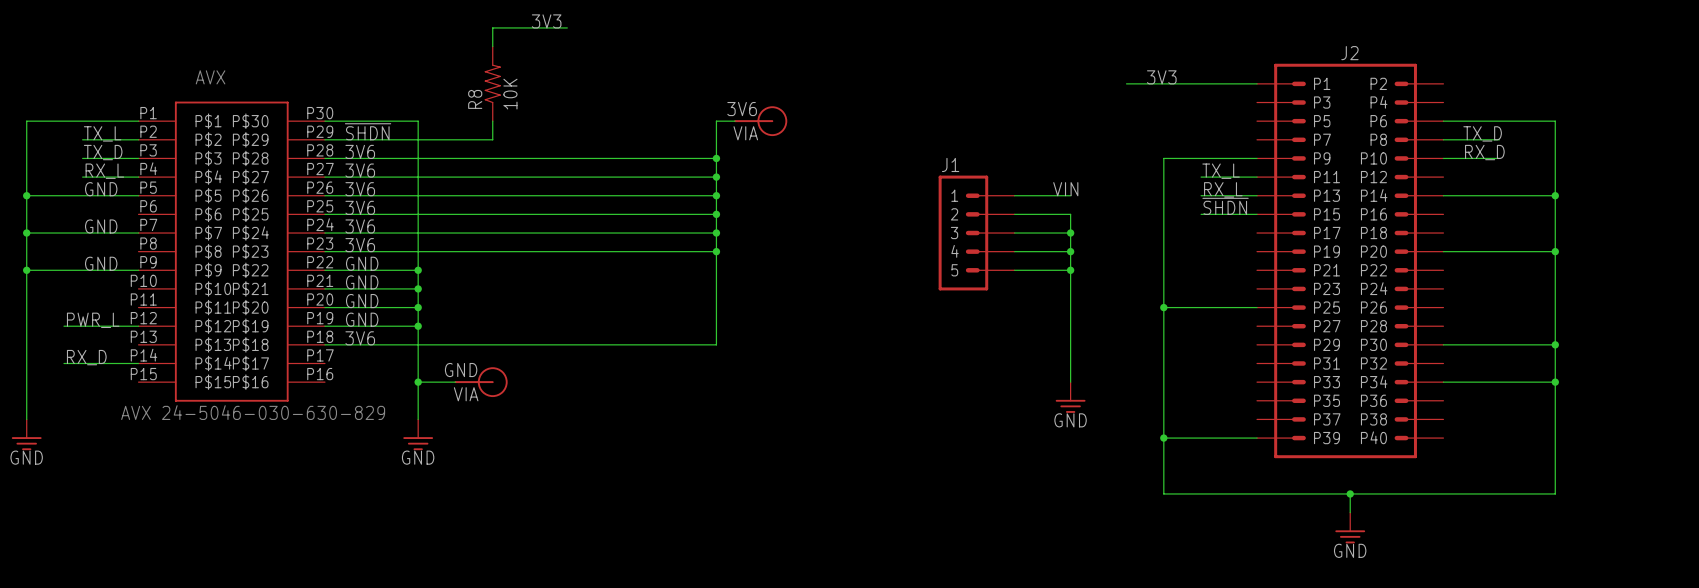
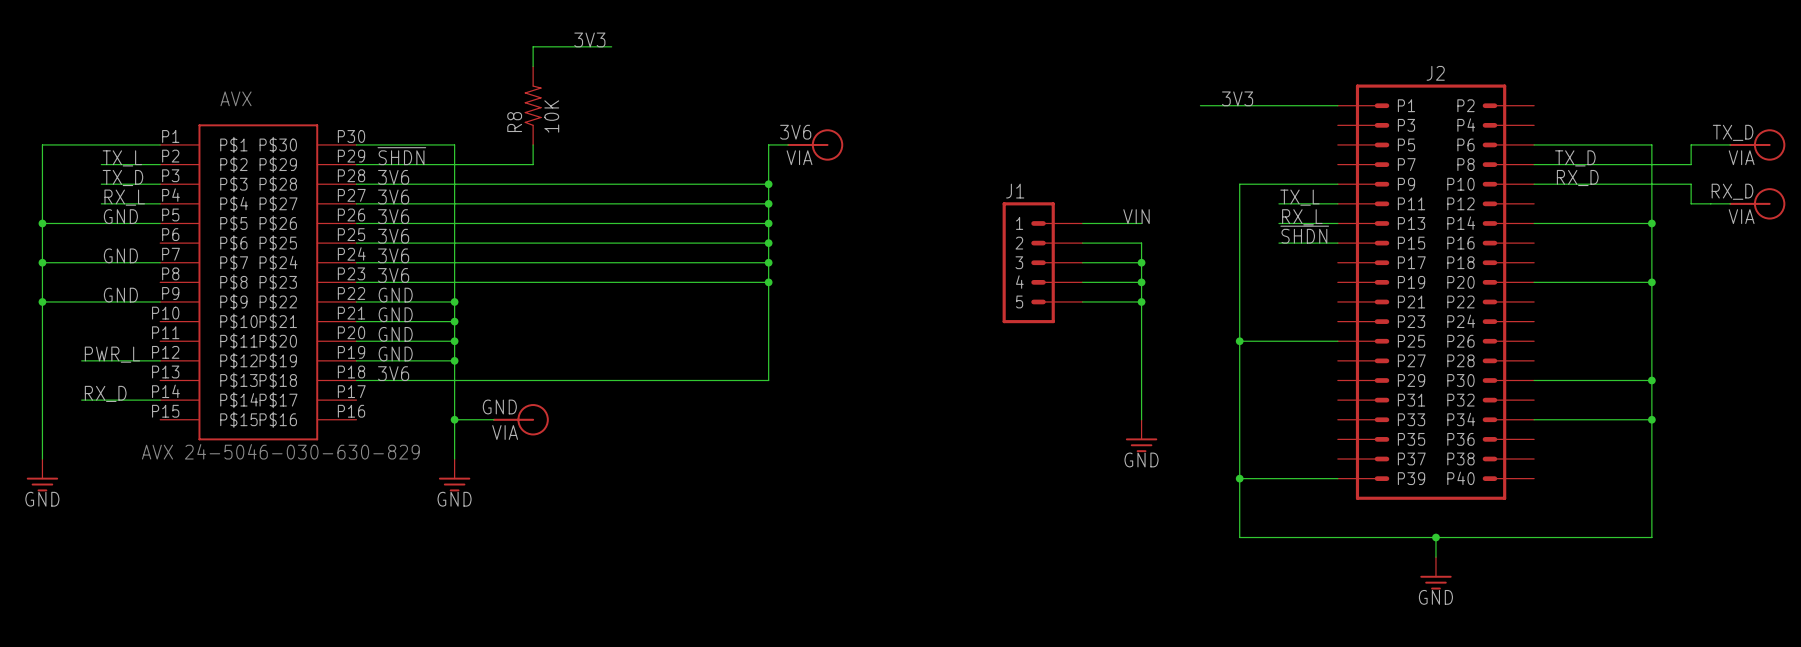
wire: none -> (1730, 144) (1691, 144) (1691, 164) (1592, 164)
part: none -> TX_D (1757, 144)
wire: none -> (1592, 184) (1691, 184) (1691, 203) (1730, 203)
part: none -> RX_D (1757, 203)

